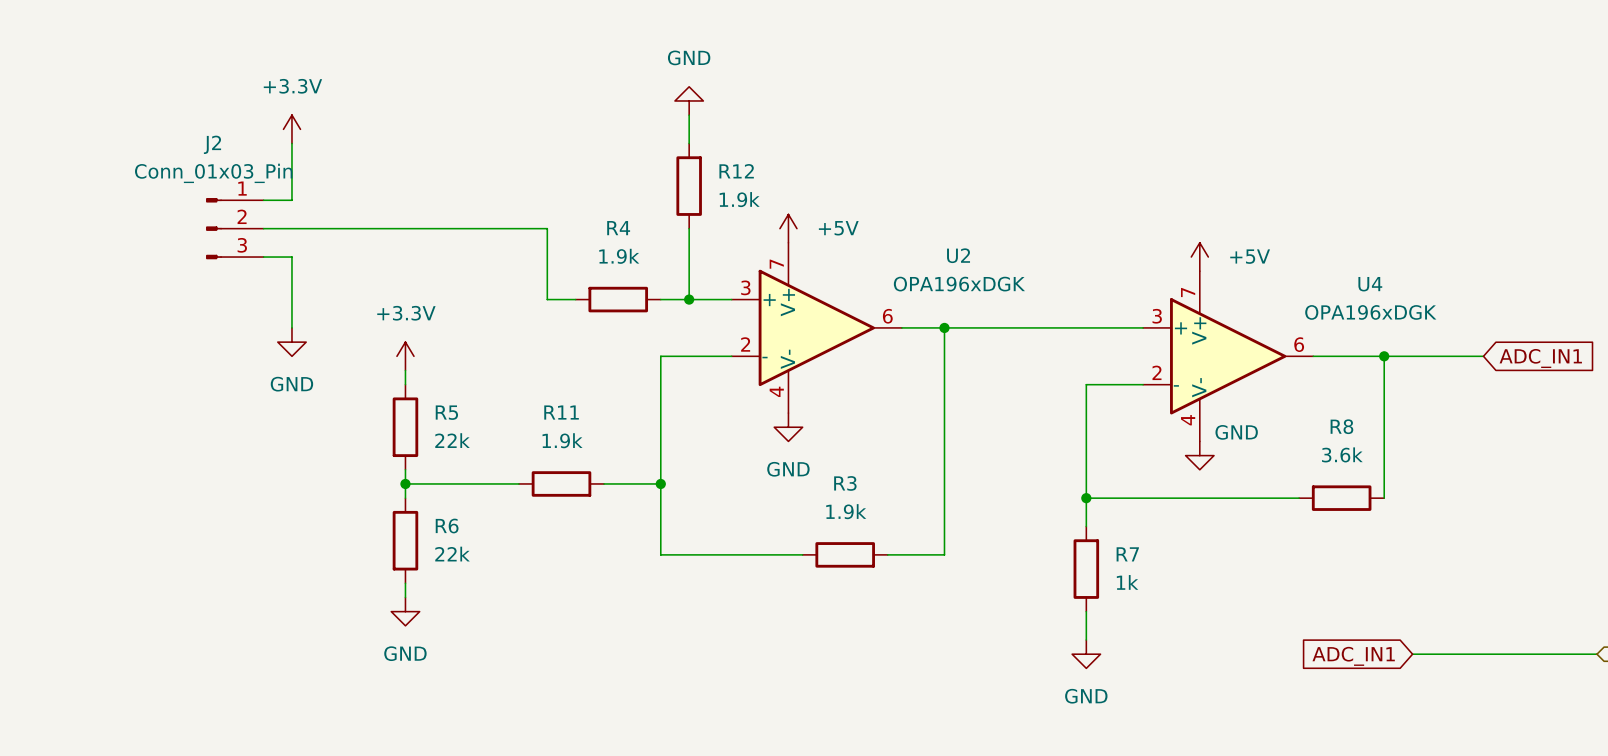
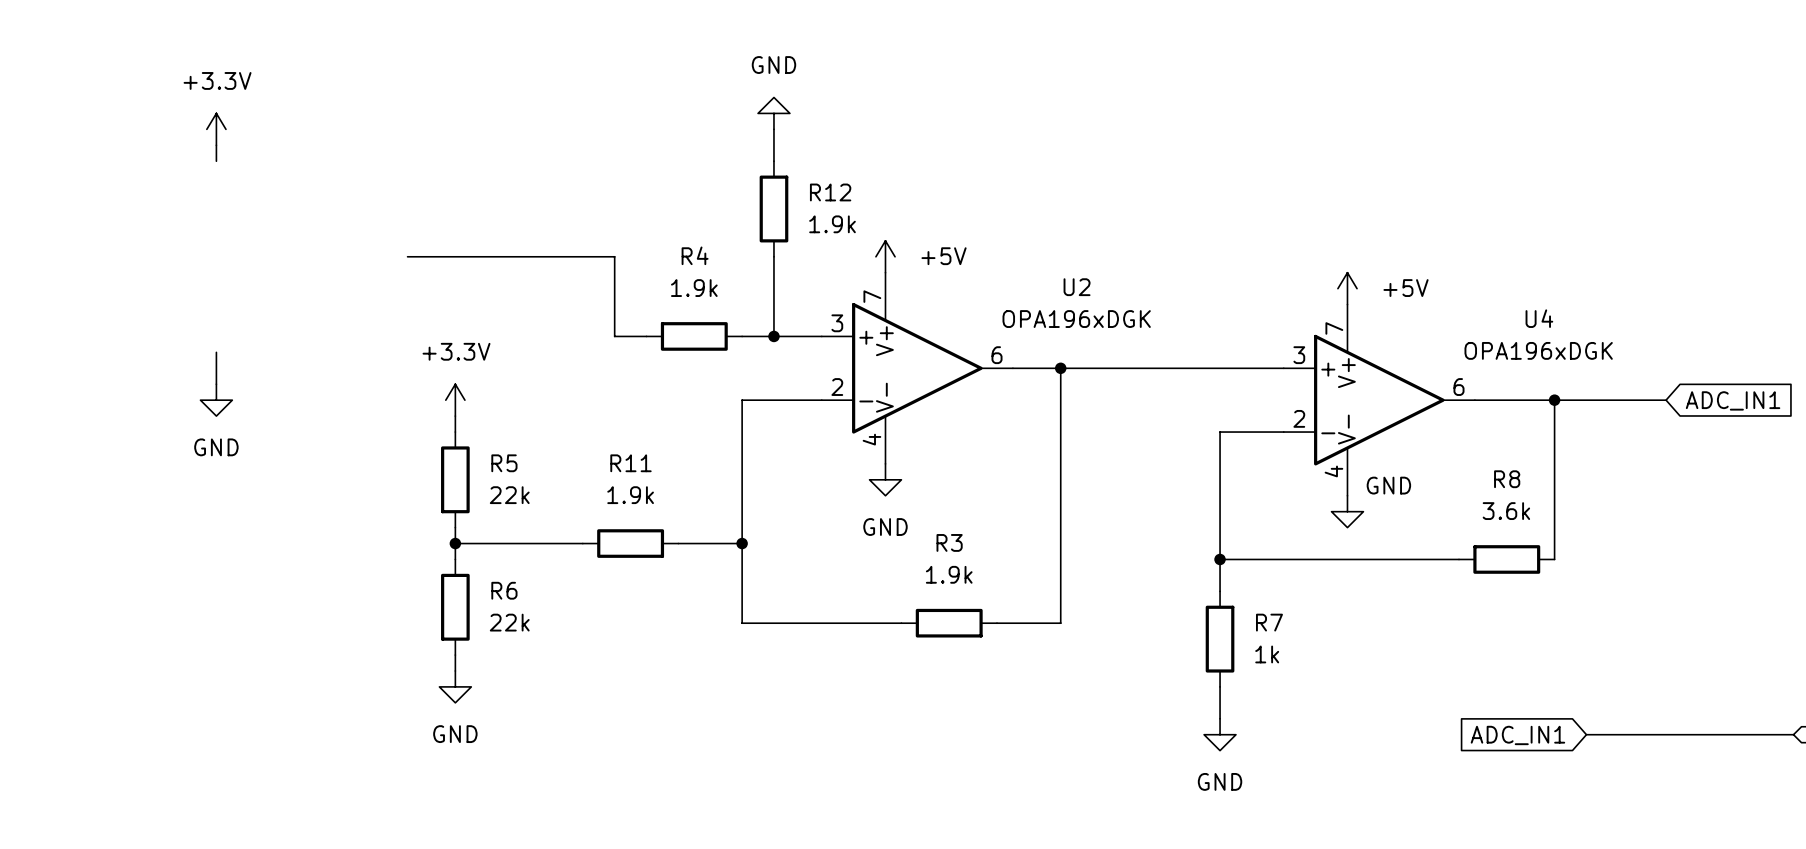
wire: none -> (216, 145) (216, 161)
power symbol position: +3.3V (291, 129) -> +3.3V (216, 129)
wire: (291, 143) (291, 200) (263, 200) -> none
J2: Conn_01x03_Pin (234, 228) -> none
wire: (263, 228) (362, 228) -> none
wire: (263, 257) (291, 257) (291, 327) -> none
wire: none -> (216, 352) (216, 384)
power symbol position: GND (291, 342) -> GND (216, 400)

